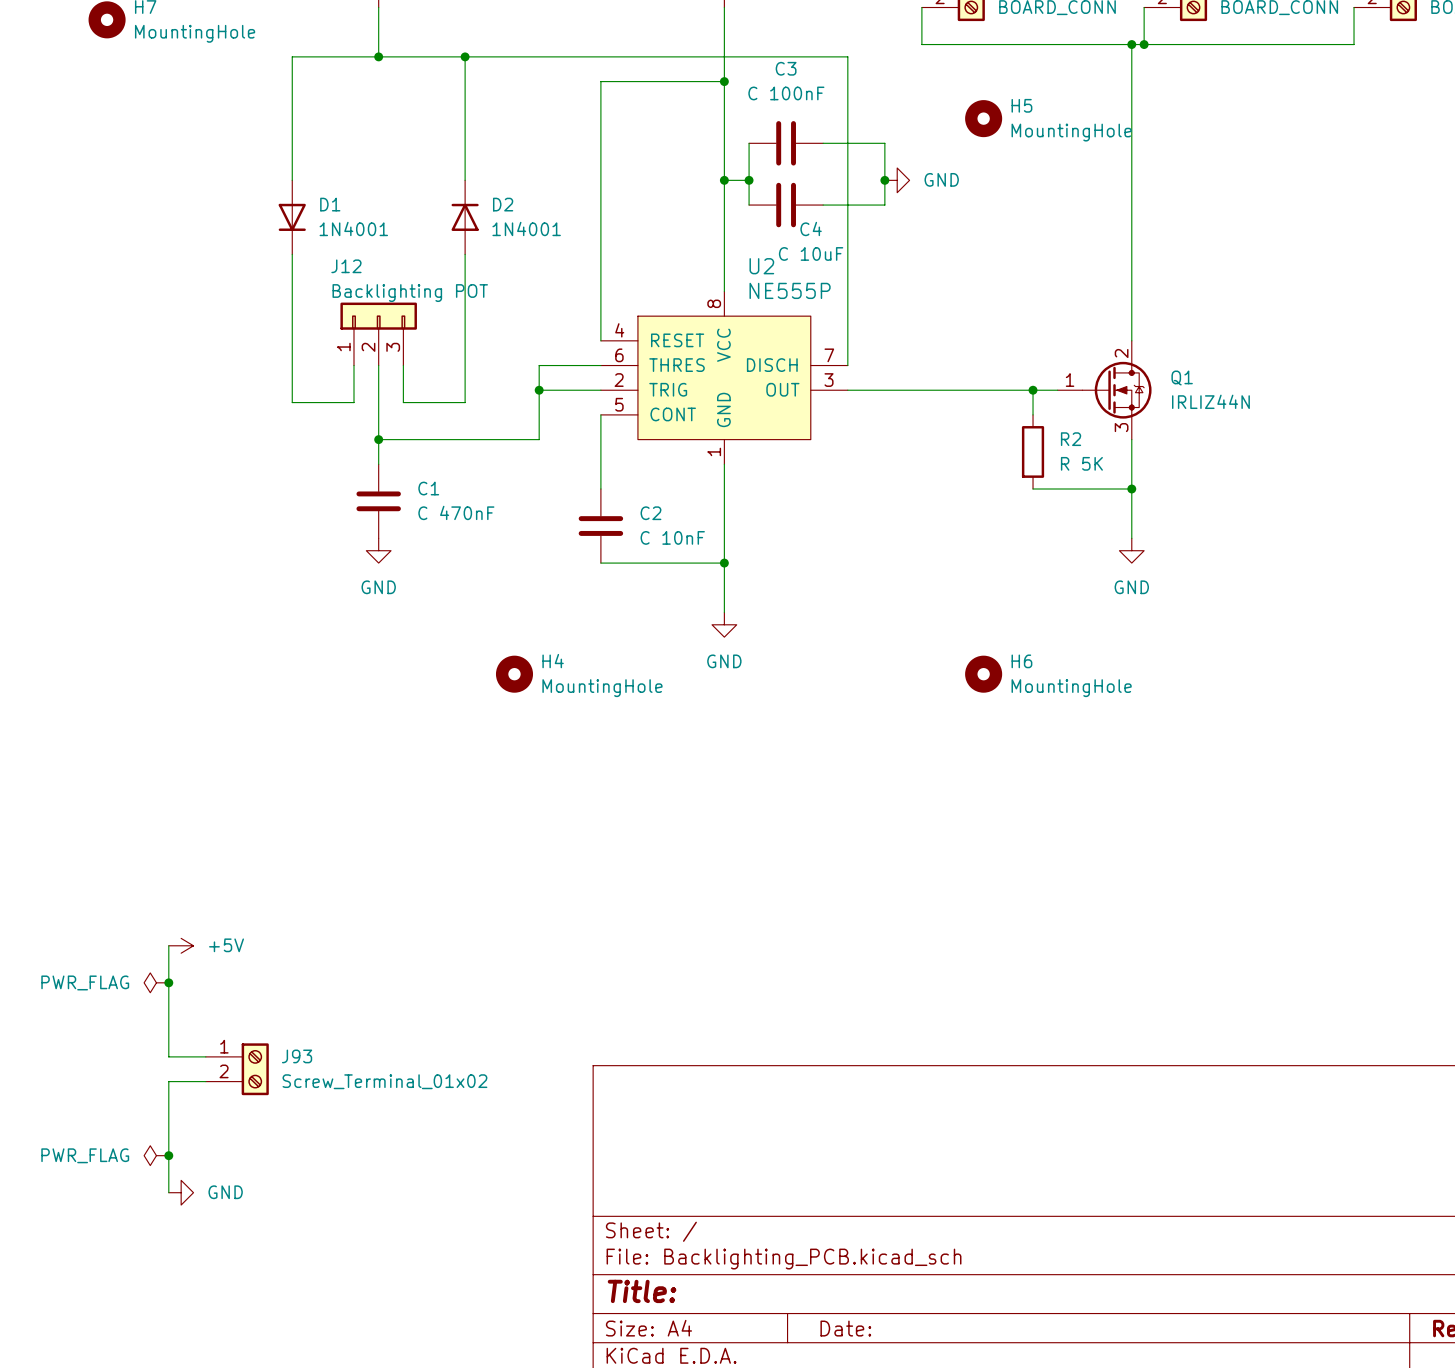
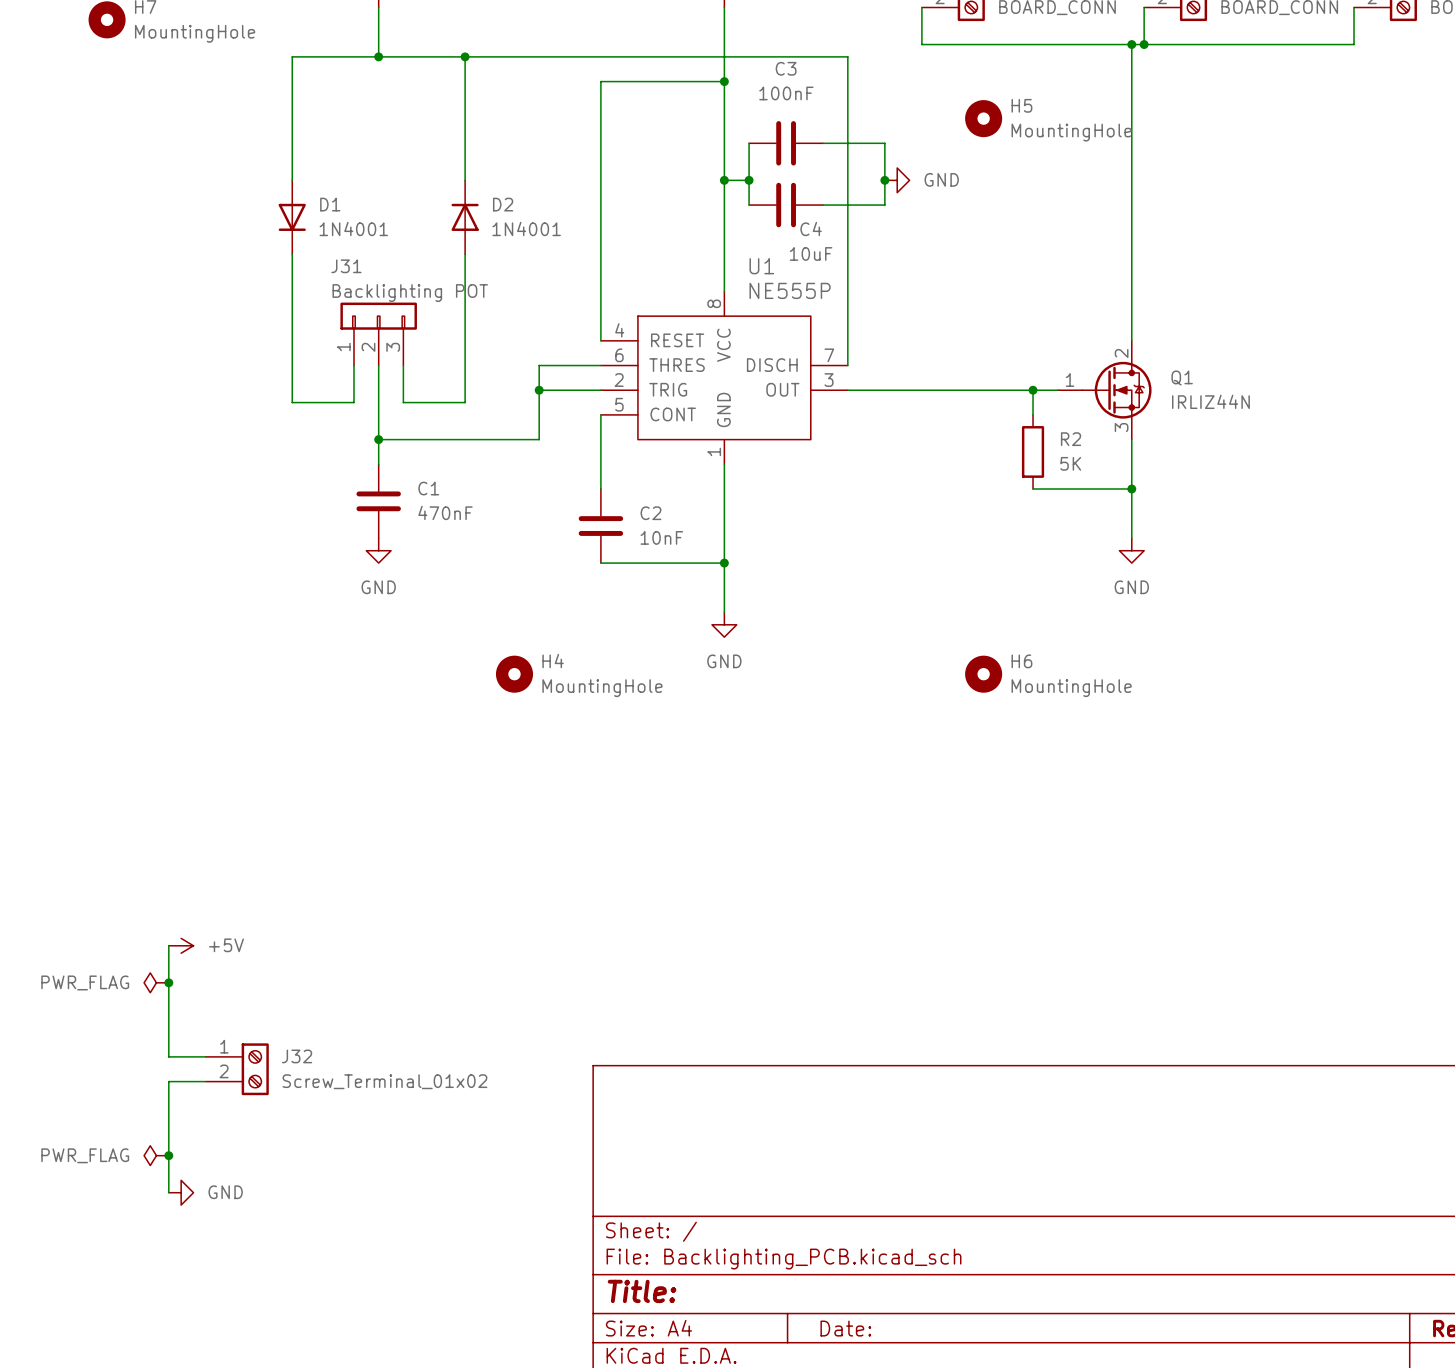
C3 value: C 100nF (786, 93) -> 100nF (786, 93)
C4 value: C 10uF (811, 253) -> 10uF (811, 253)
J12 name: J12 (346, 266) -> J31 (346, 266)
U2 name: U2 (761, 266) -> U1 (761, 266)
R2 value: R 5K (1081, 463) -> 5K (1070, 463)
C1 value: C 470nF (456, 512) -> 470nF (445, 512)
C2 value: C 10nF (672, 537) -> 10nF (661, 537)
J93 name: J93 (297, 1056) -> J32 (297, 1056)

